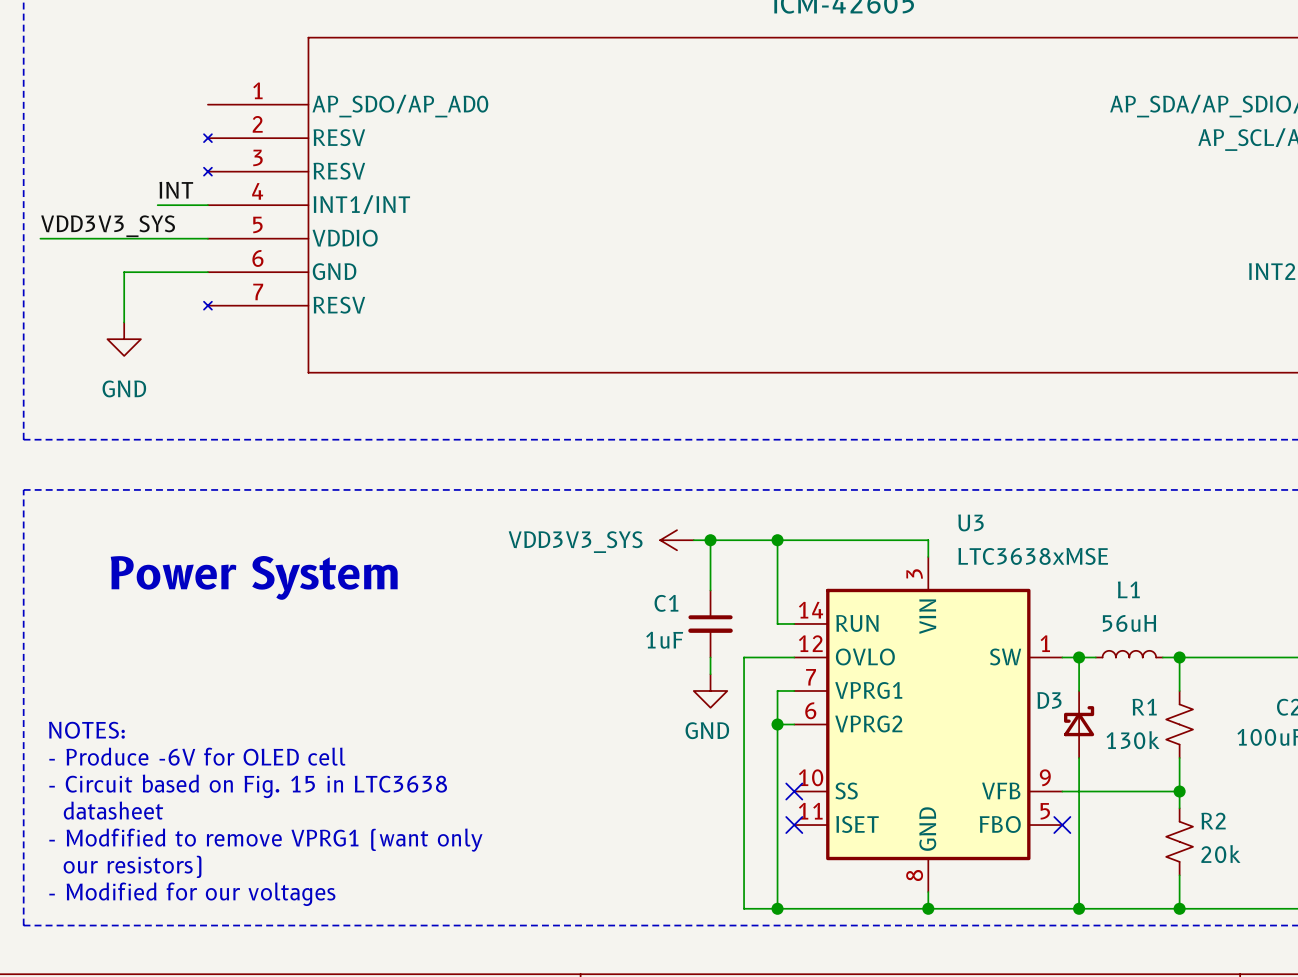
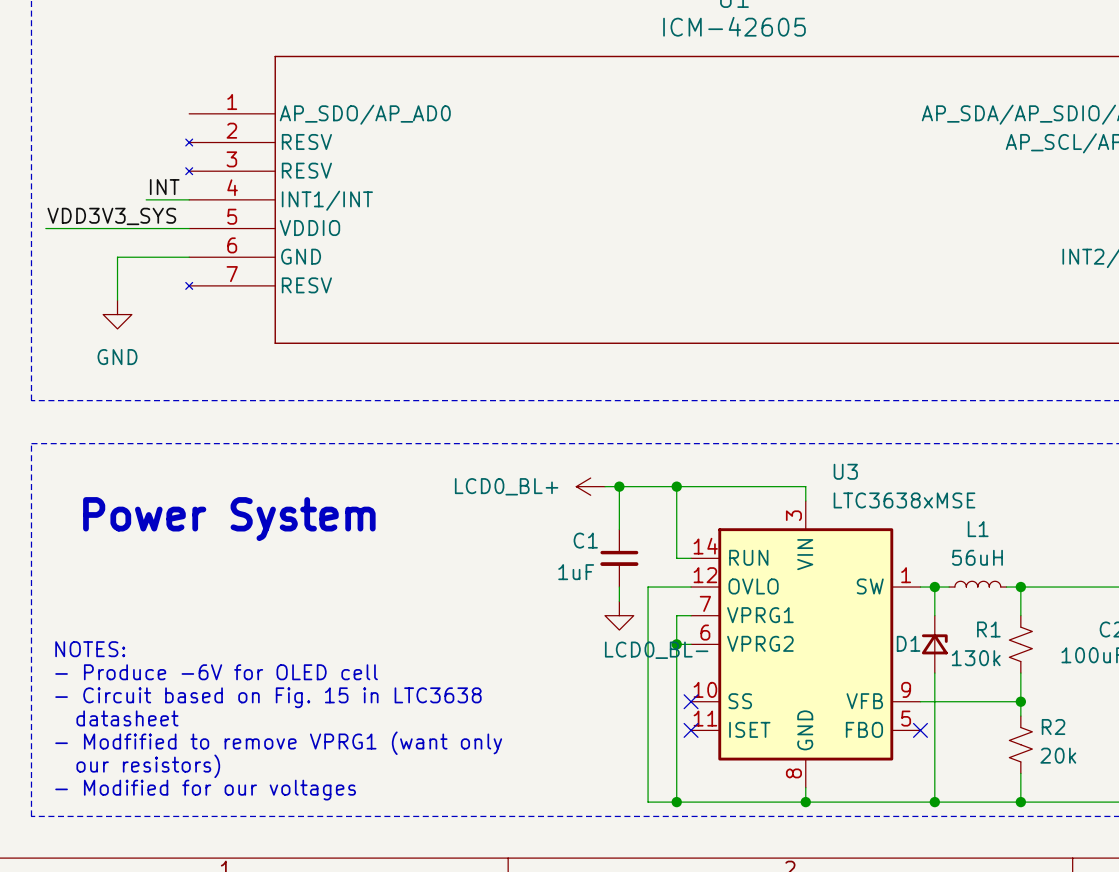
power symbol: VDD3V3_SYS (677, 540) -> LCD0_BL+ (590, 486)
power symbol: GND (710, 690) -> LCD0_BL- (619, 615)
D3: (1079, 724) -> none
D1: none -> (934, 644)

